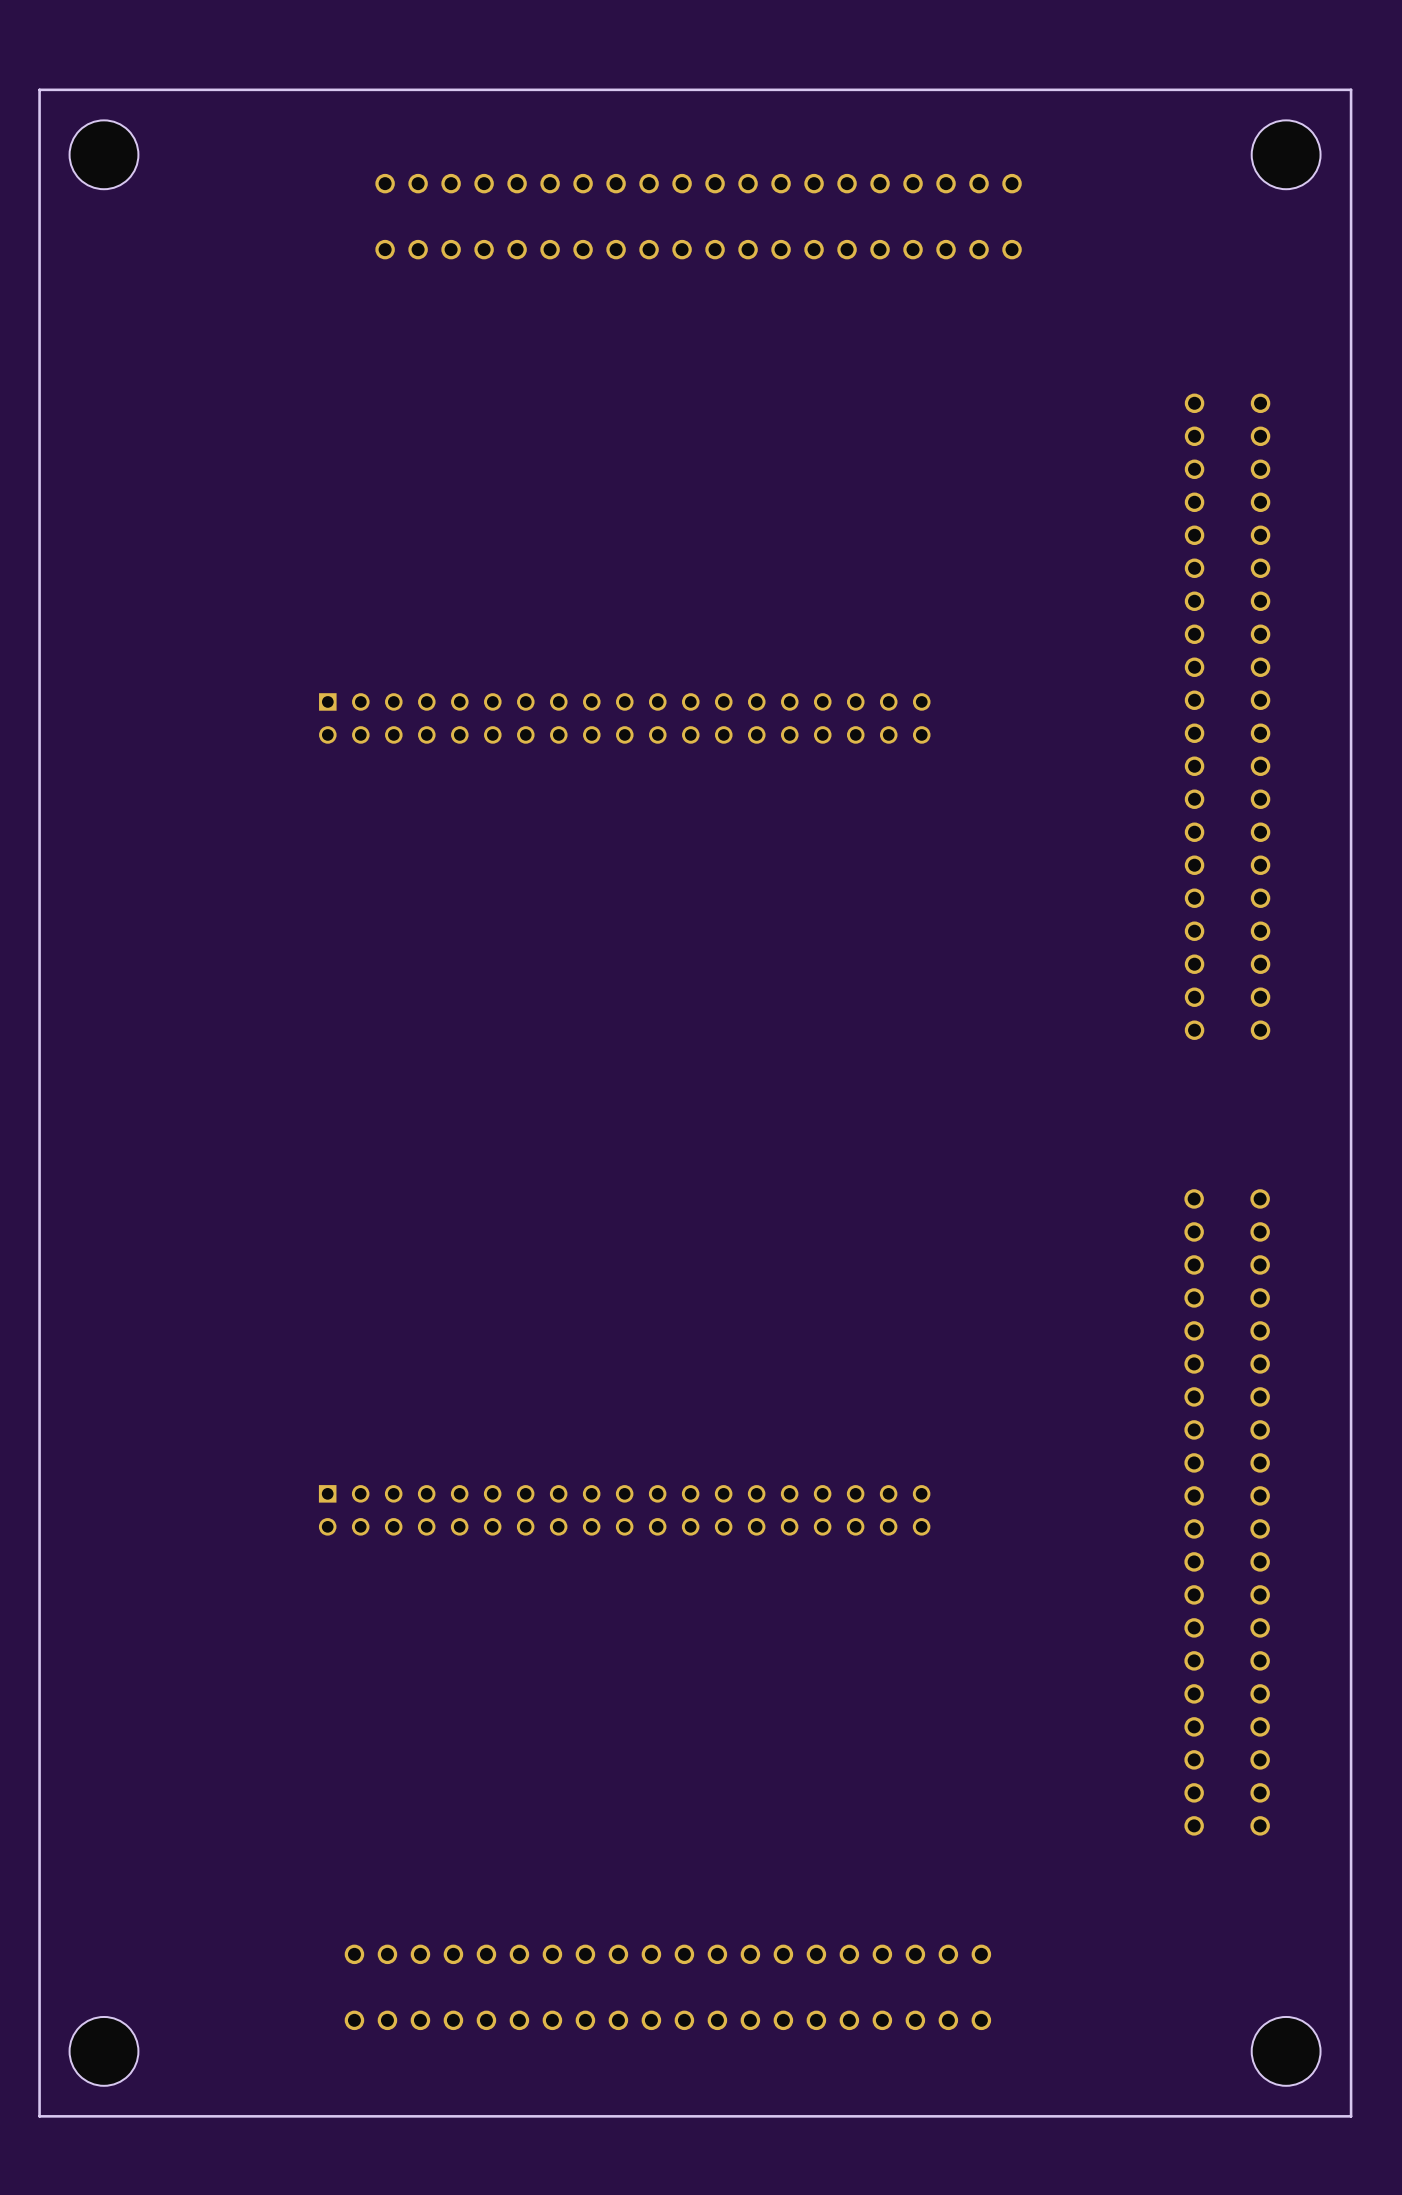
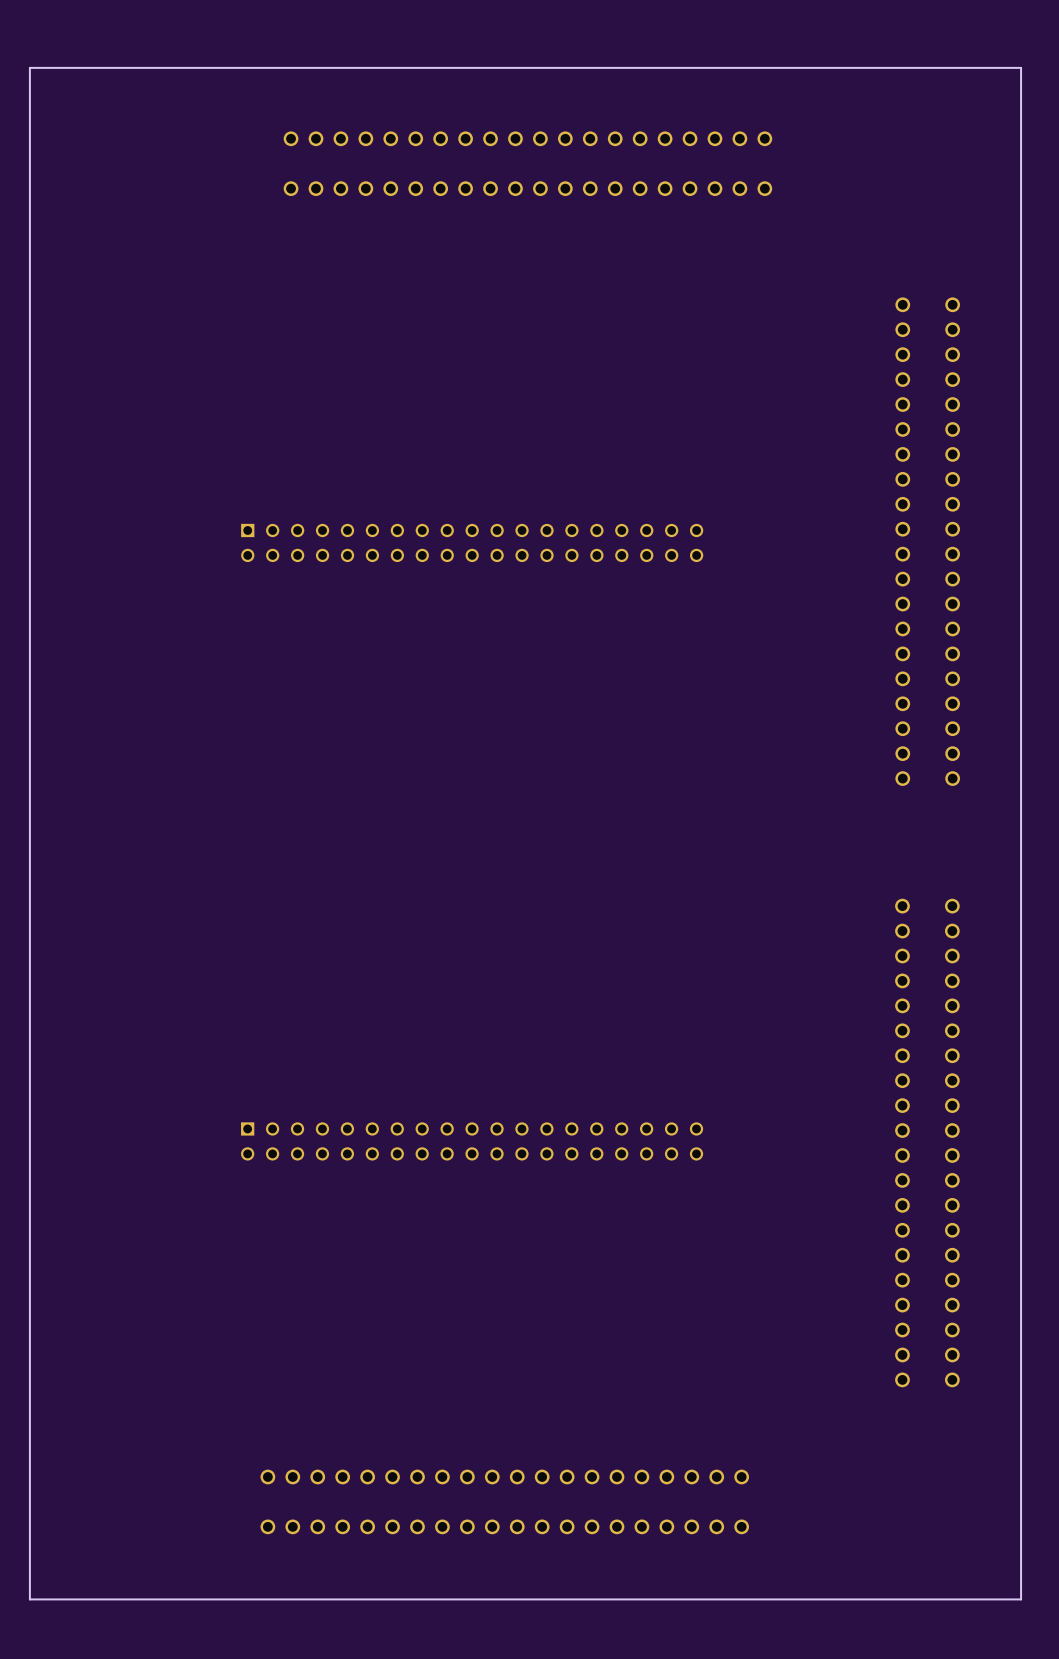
part: (103, 154) -> none
part: (1286, 154) -> none
part: (103, 2051) -> none
part: (1286, 2051) -> none

